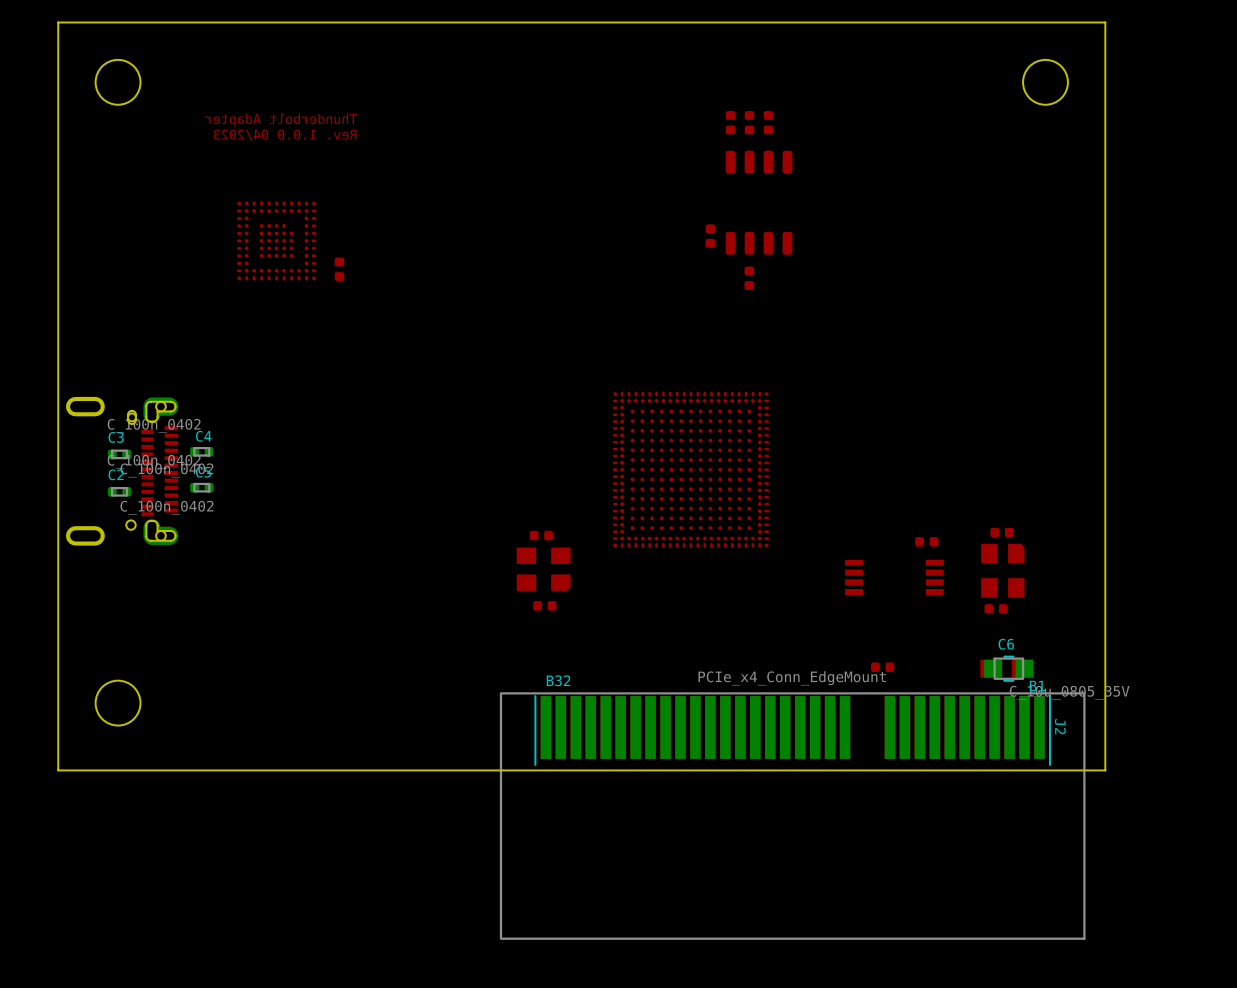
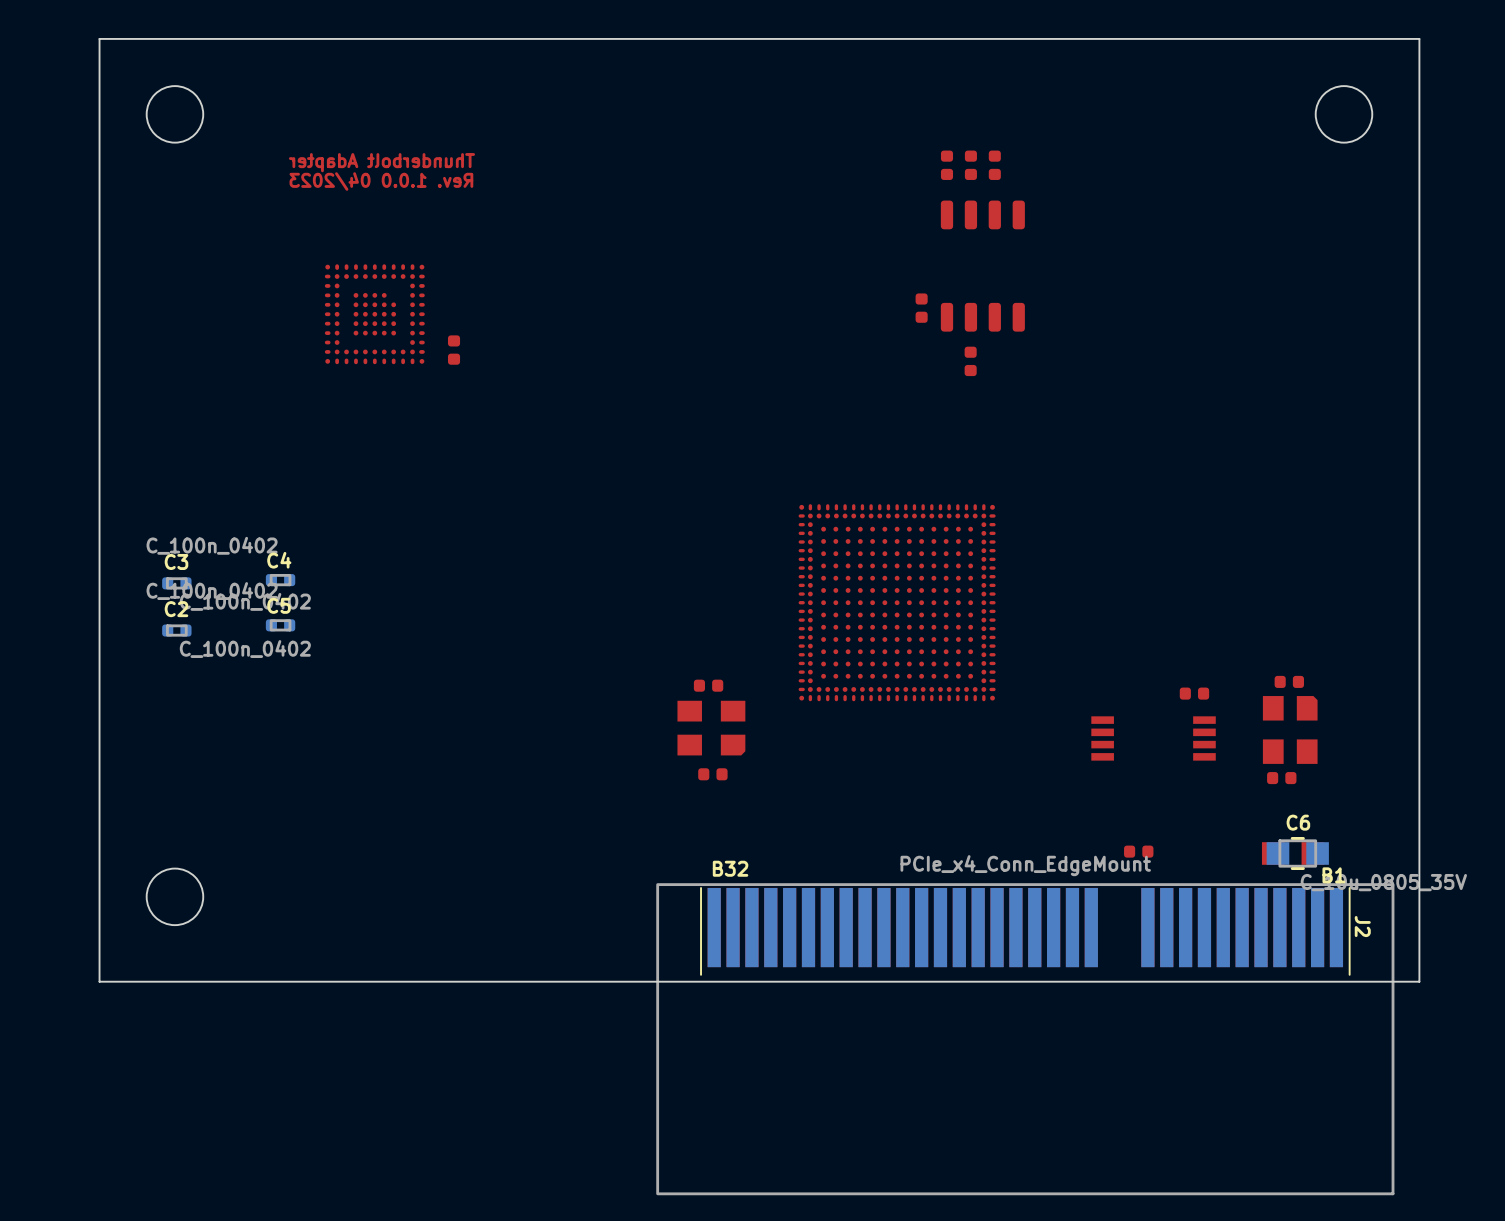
part: (122, 471) -> none

